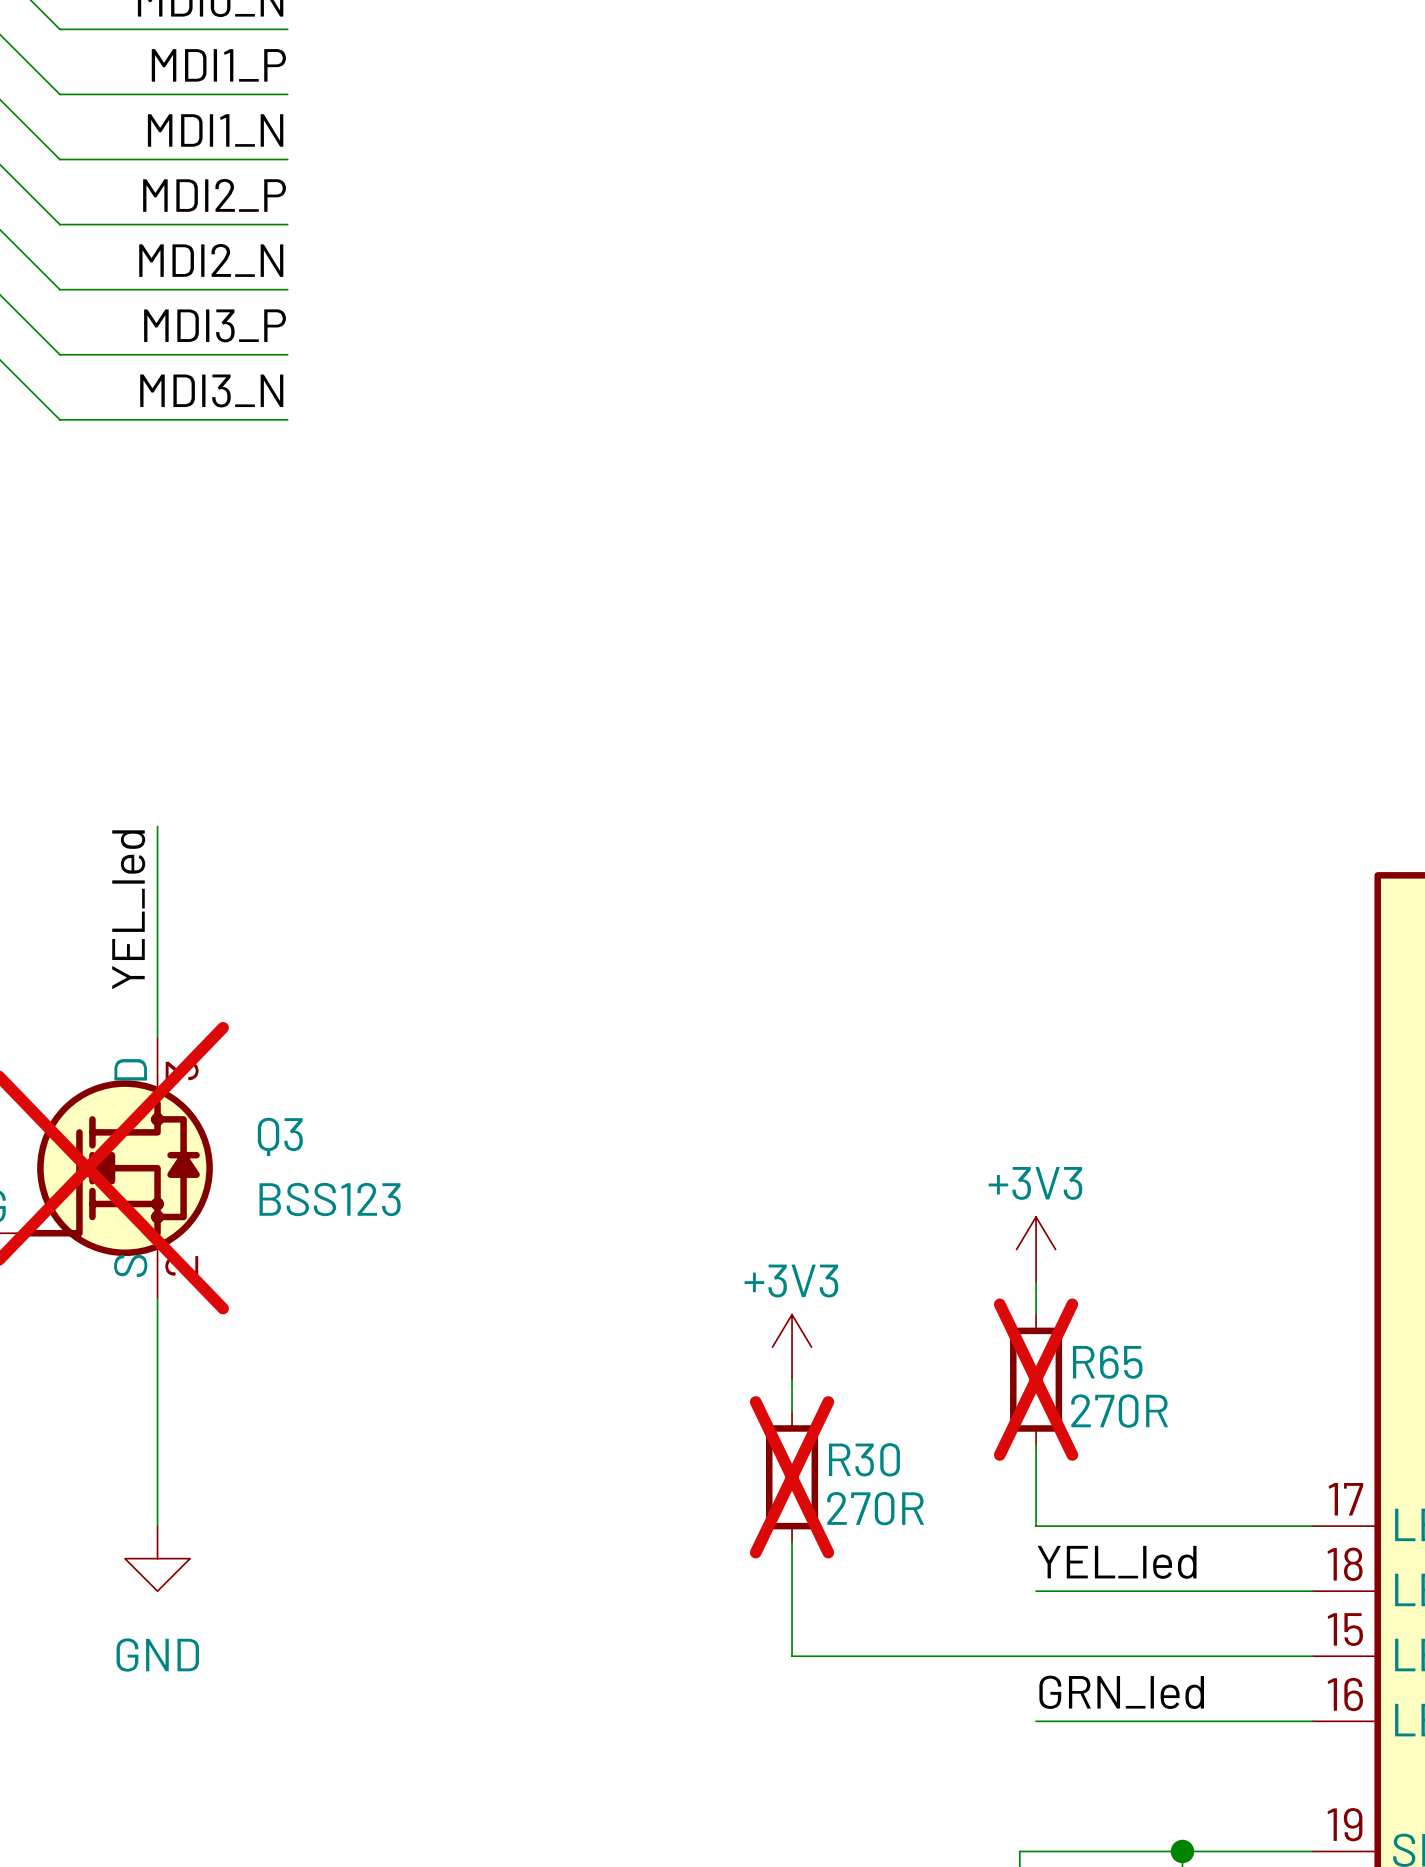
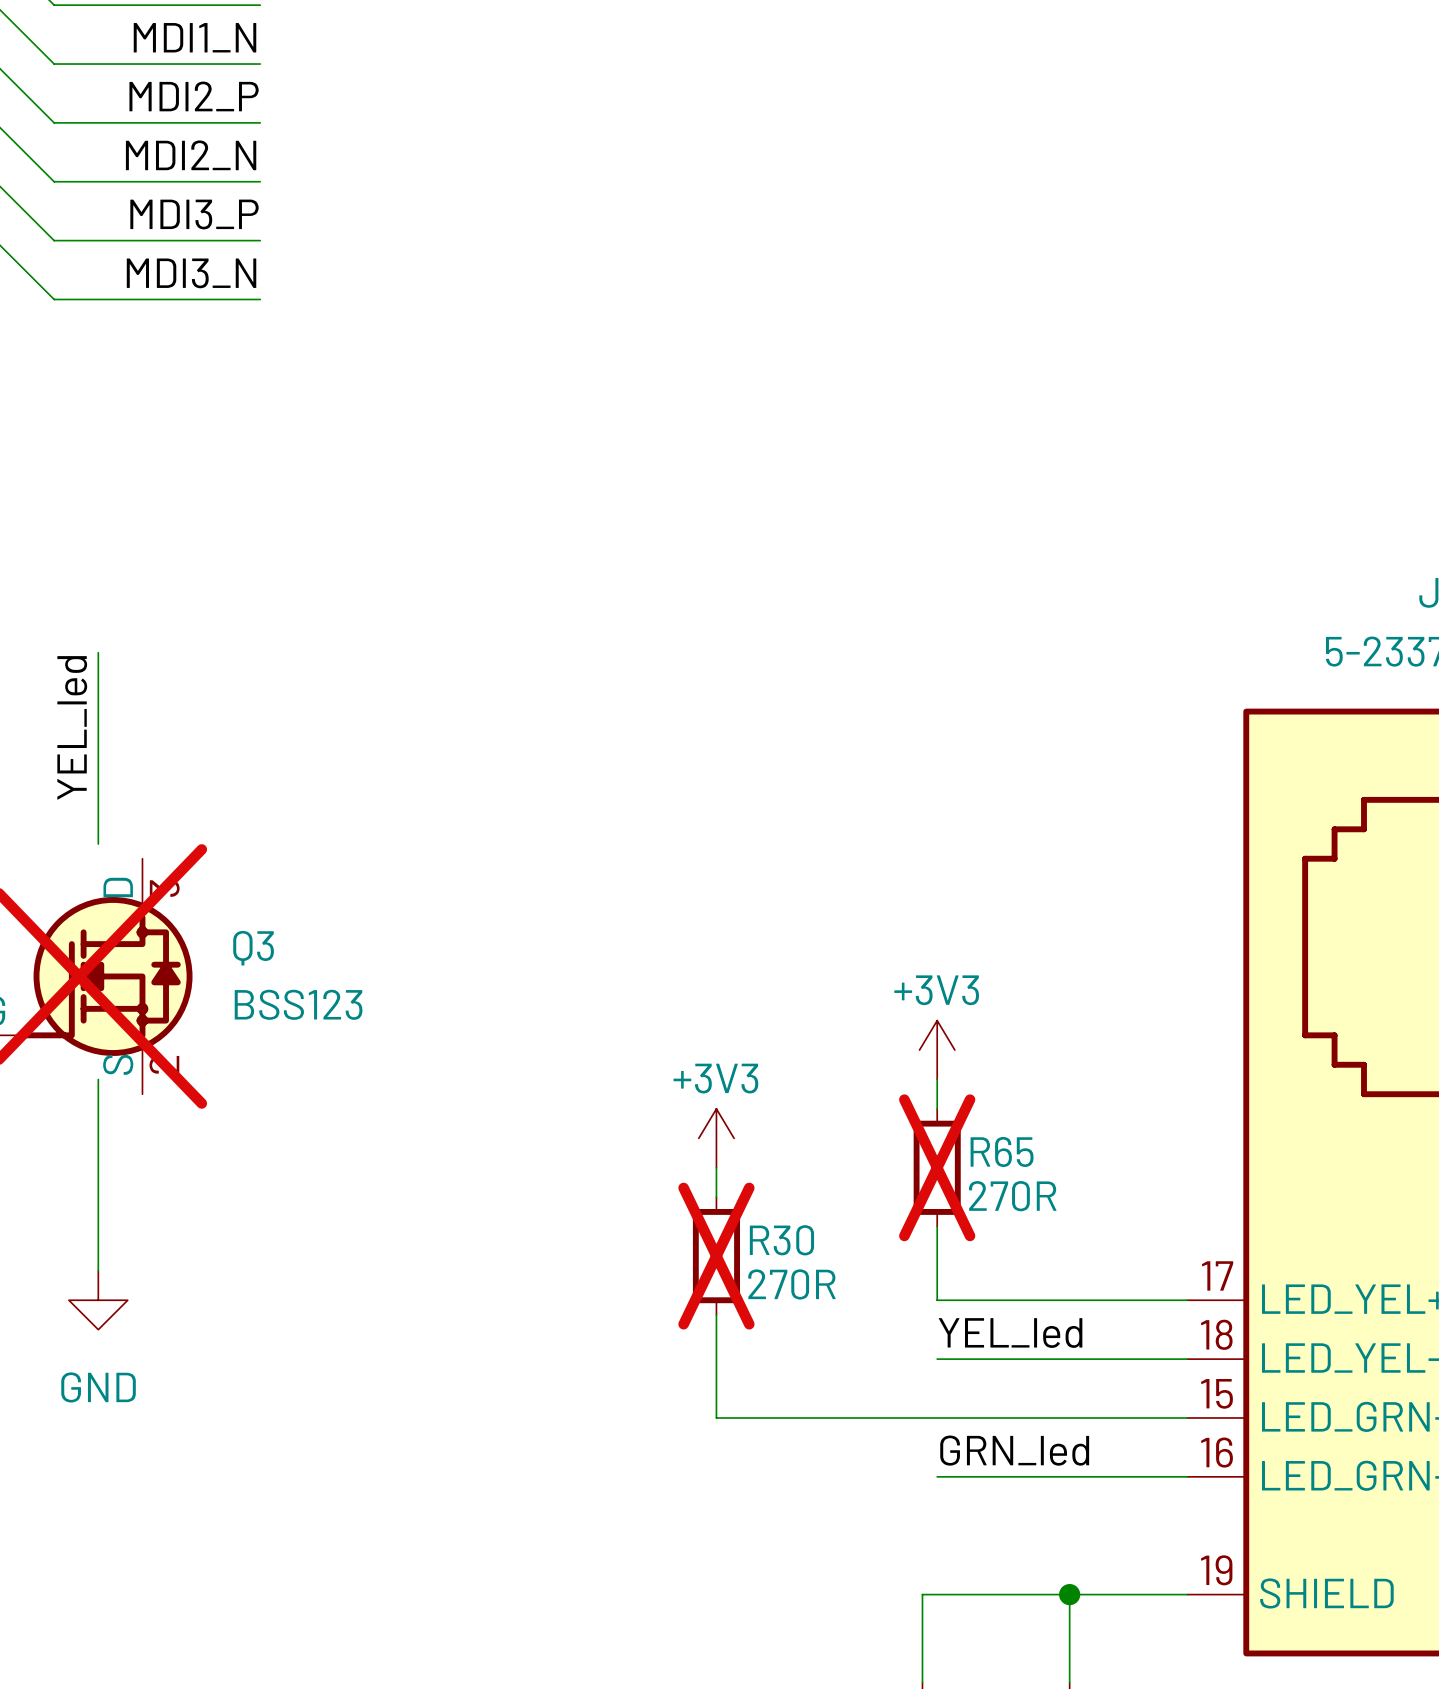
wire: (157, 826) (157, 1038) -> (98, 652) (98, 844)
label position: YEL_led (128, 909) -> YEL_led (72, 727)
wire: none -> (98, 1079) (98, 1270)
wire: (157, 1298) (157, 1526) -> none
power symbol position: GND (157, 1558) -> GND (98, 1300)

